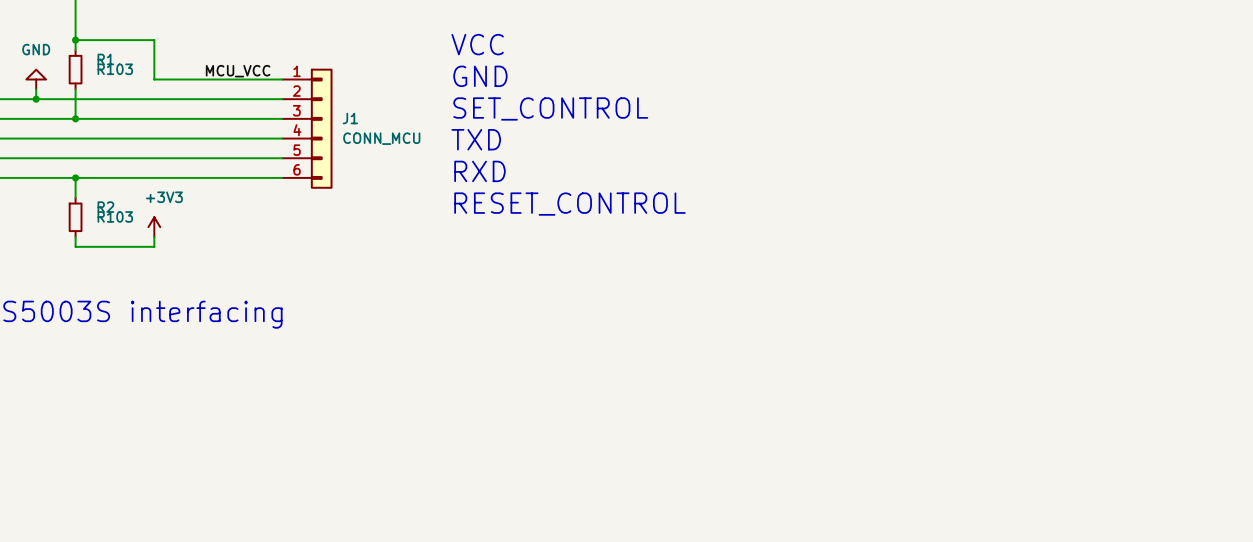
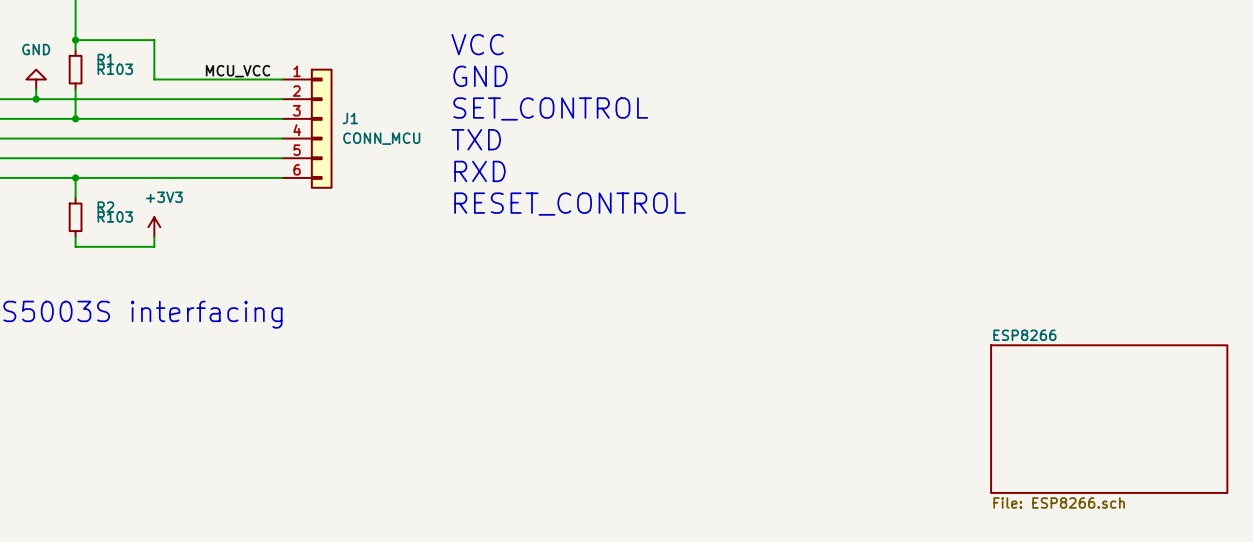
sheet ESP8266: none -> File: ESP8266.sch (1109, 419)

